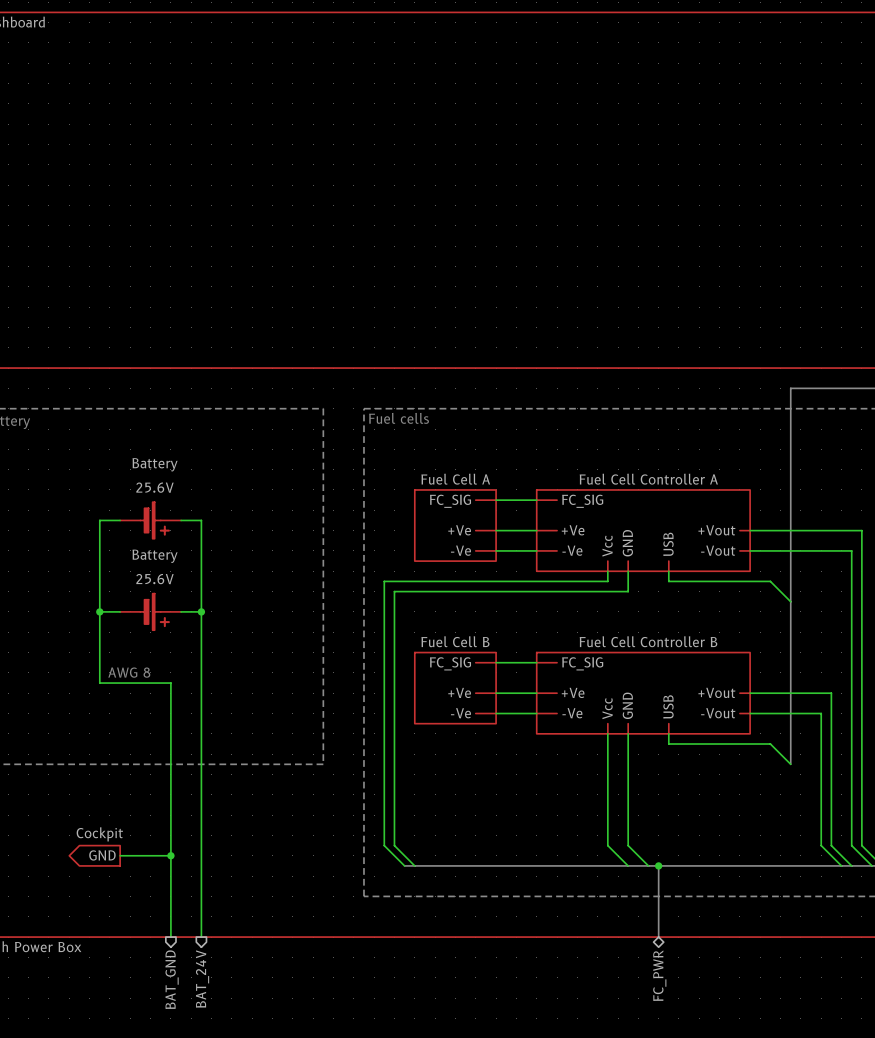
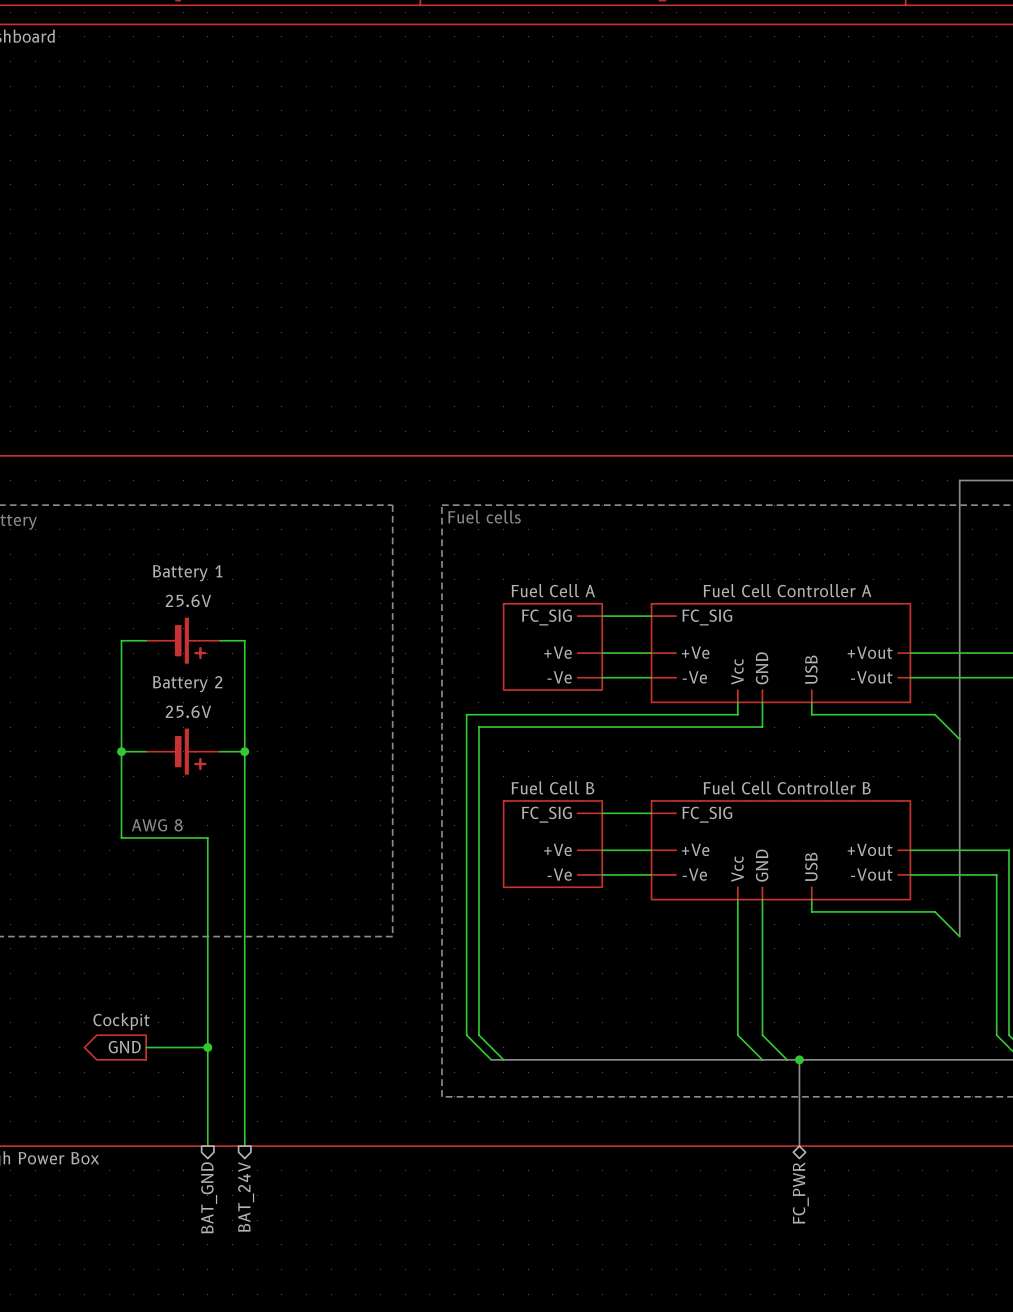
part text: Battery (155, 464) -> Battery 1 (187, 573)
part text: Battery (155, 556) -> Battery 2 (187, 684)

